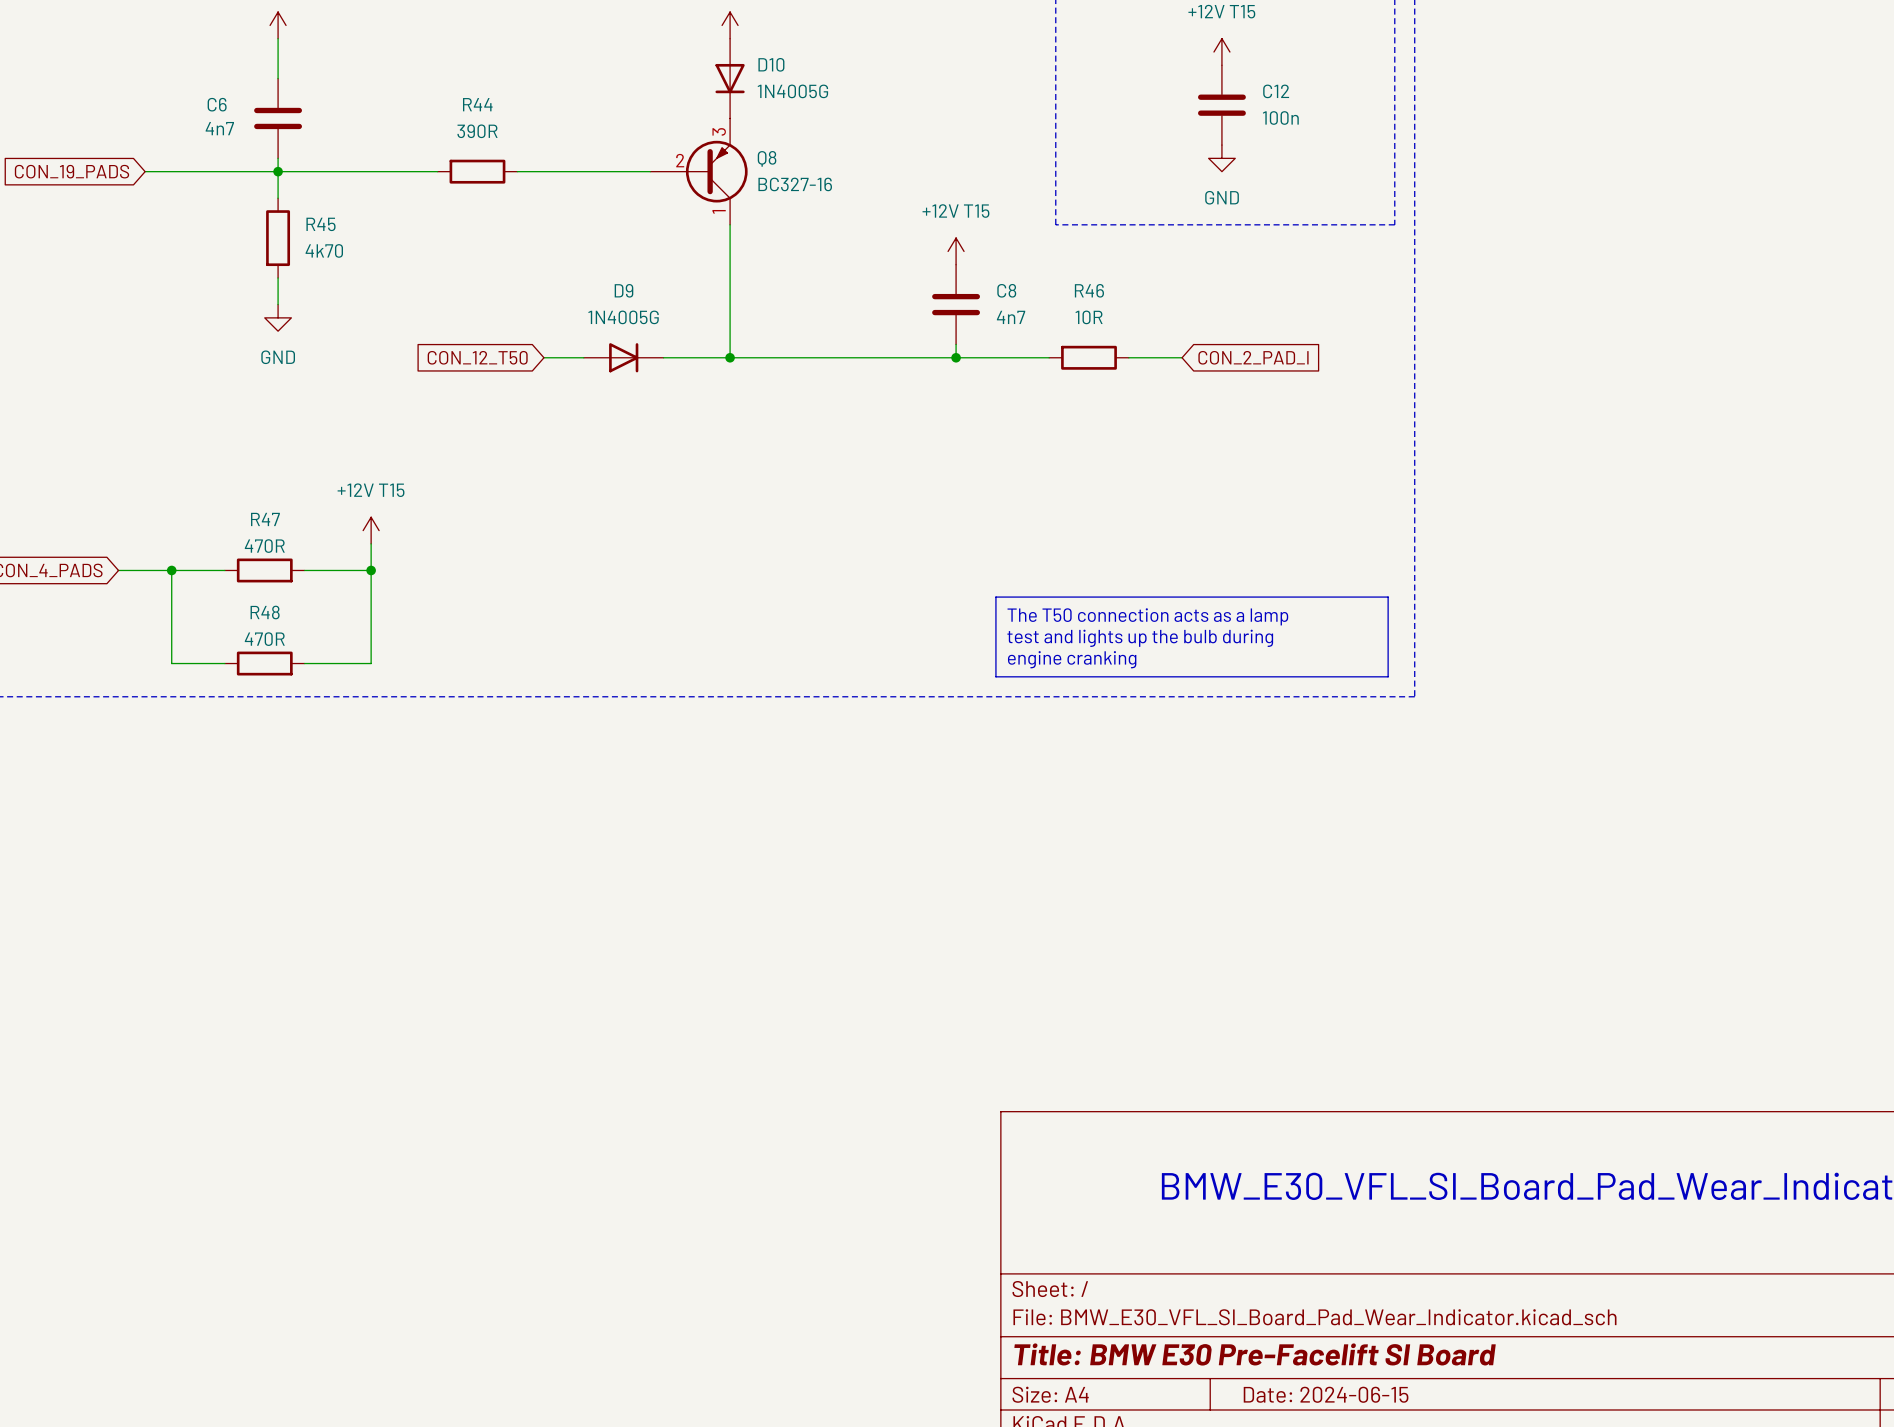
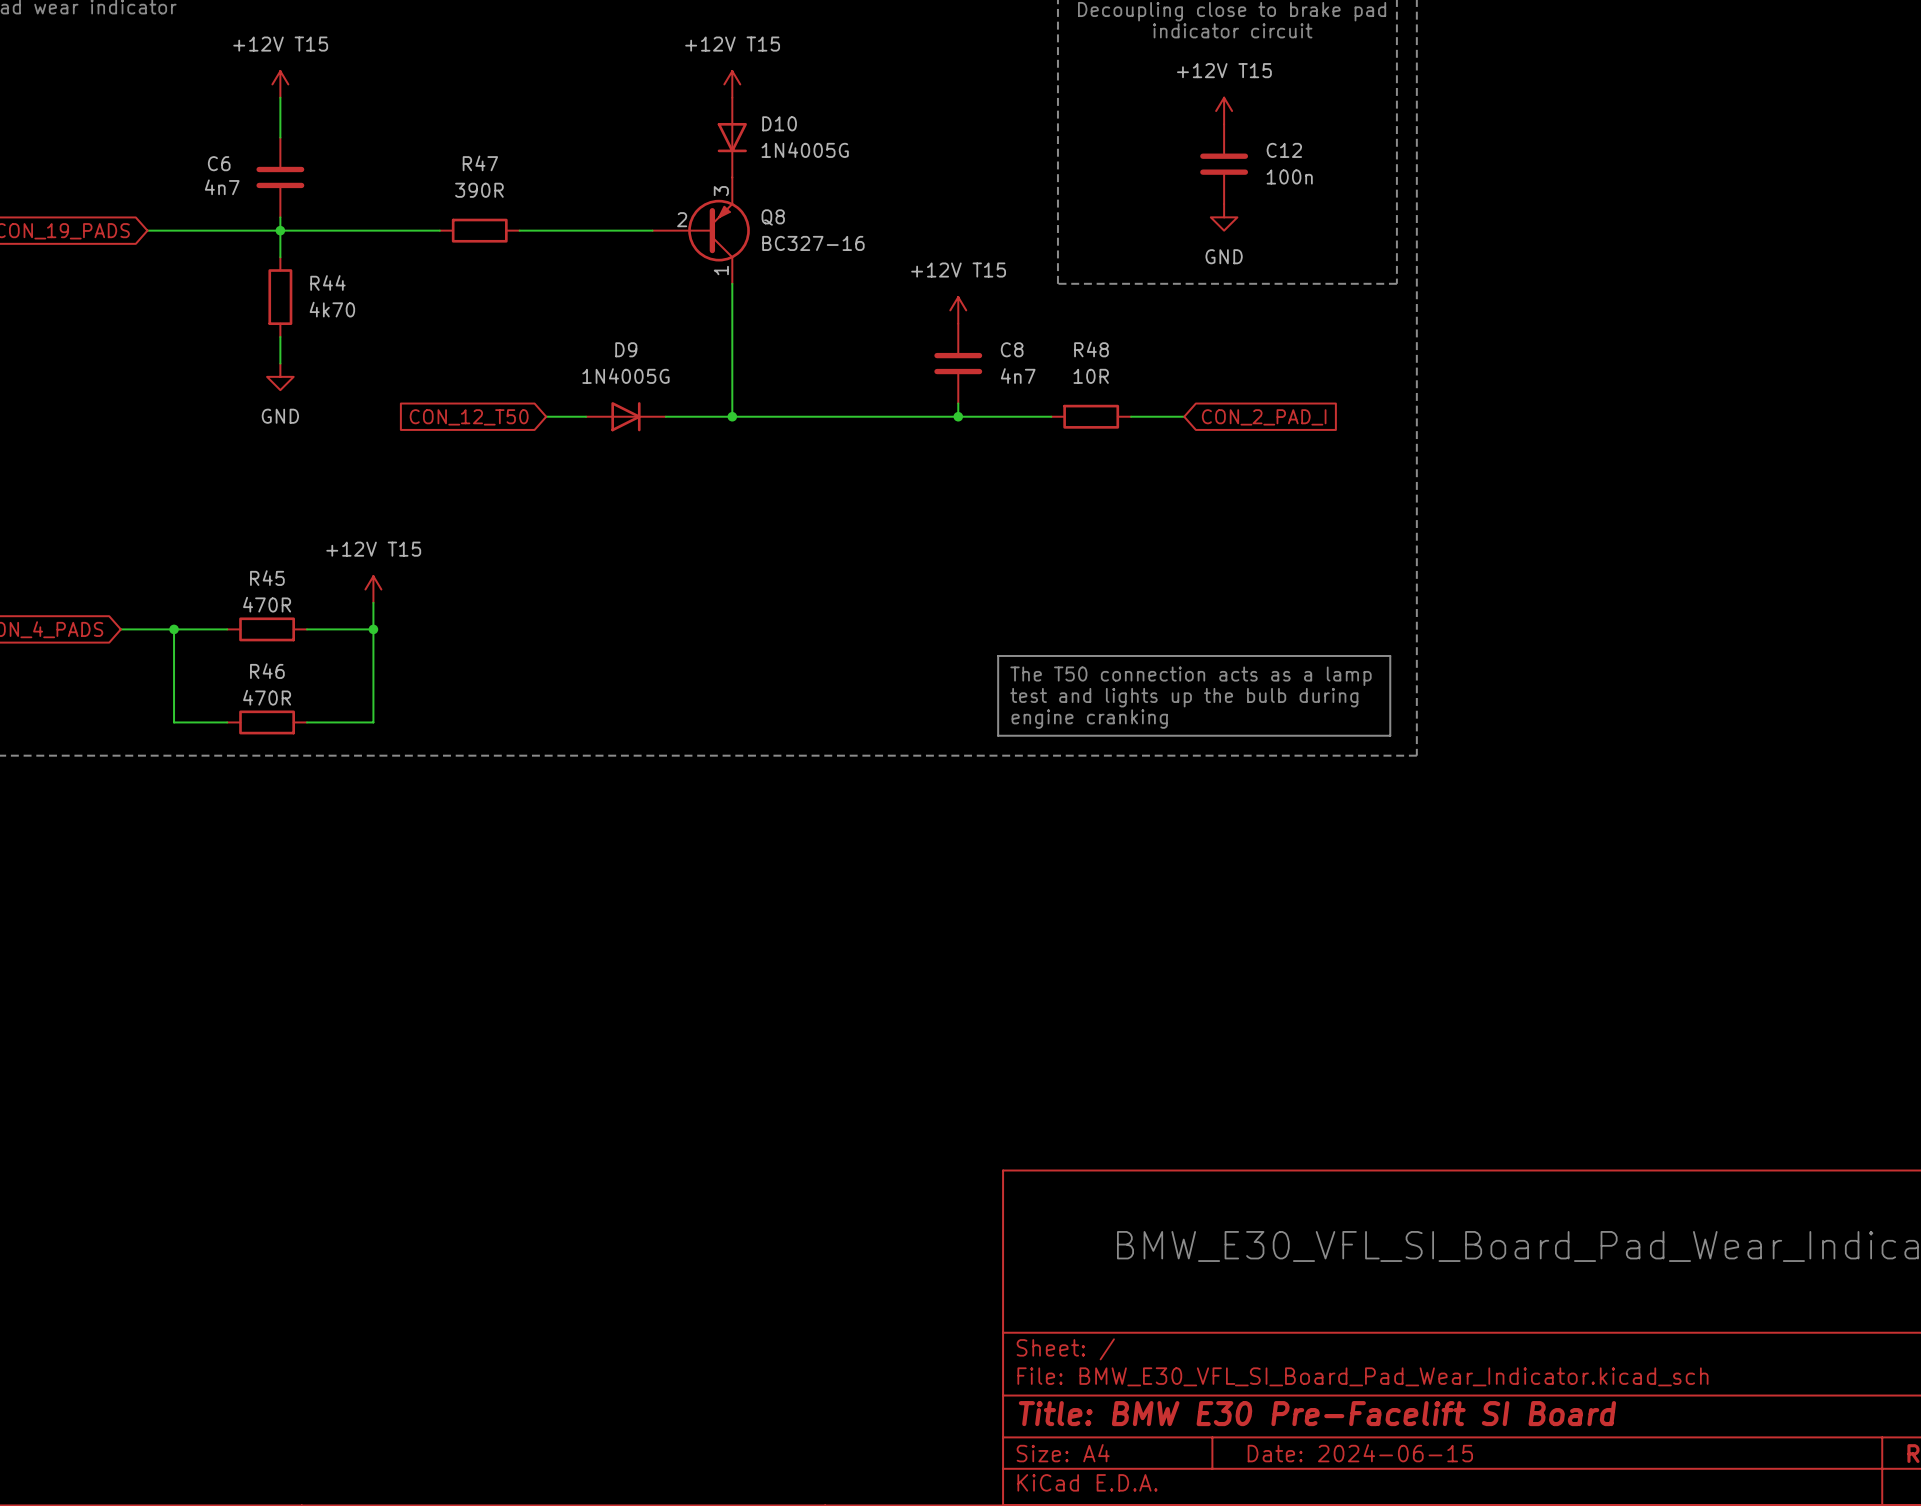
R44 name: R44 (477, 104) -> R47 (480, 163)
R45 name: R45 (321, 224) -> R44 (327, 282)
R46 name: R46 (1089, 290) -> R48 (1091, 349)
R47 name: R47 (265, 519) -> R45 (267, 578)
R48 name: R48 (265, 612) -> R46 (267, 671)

